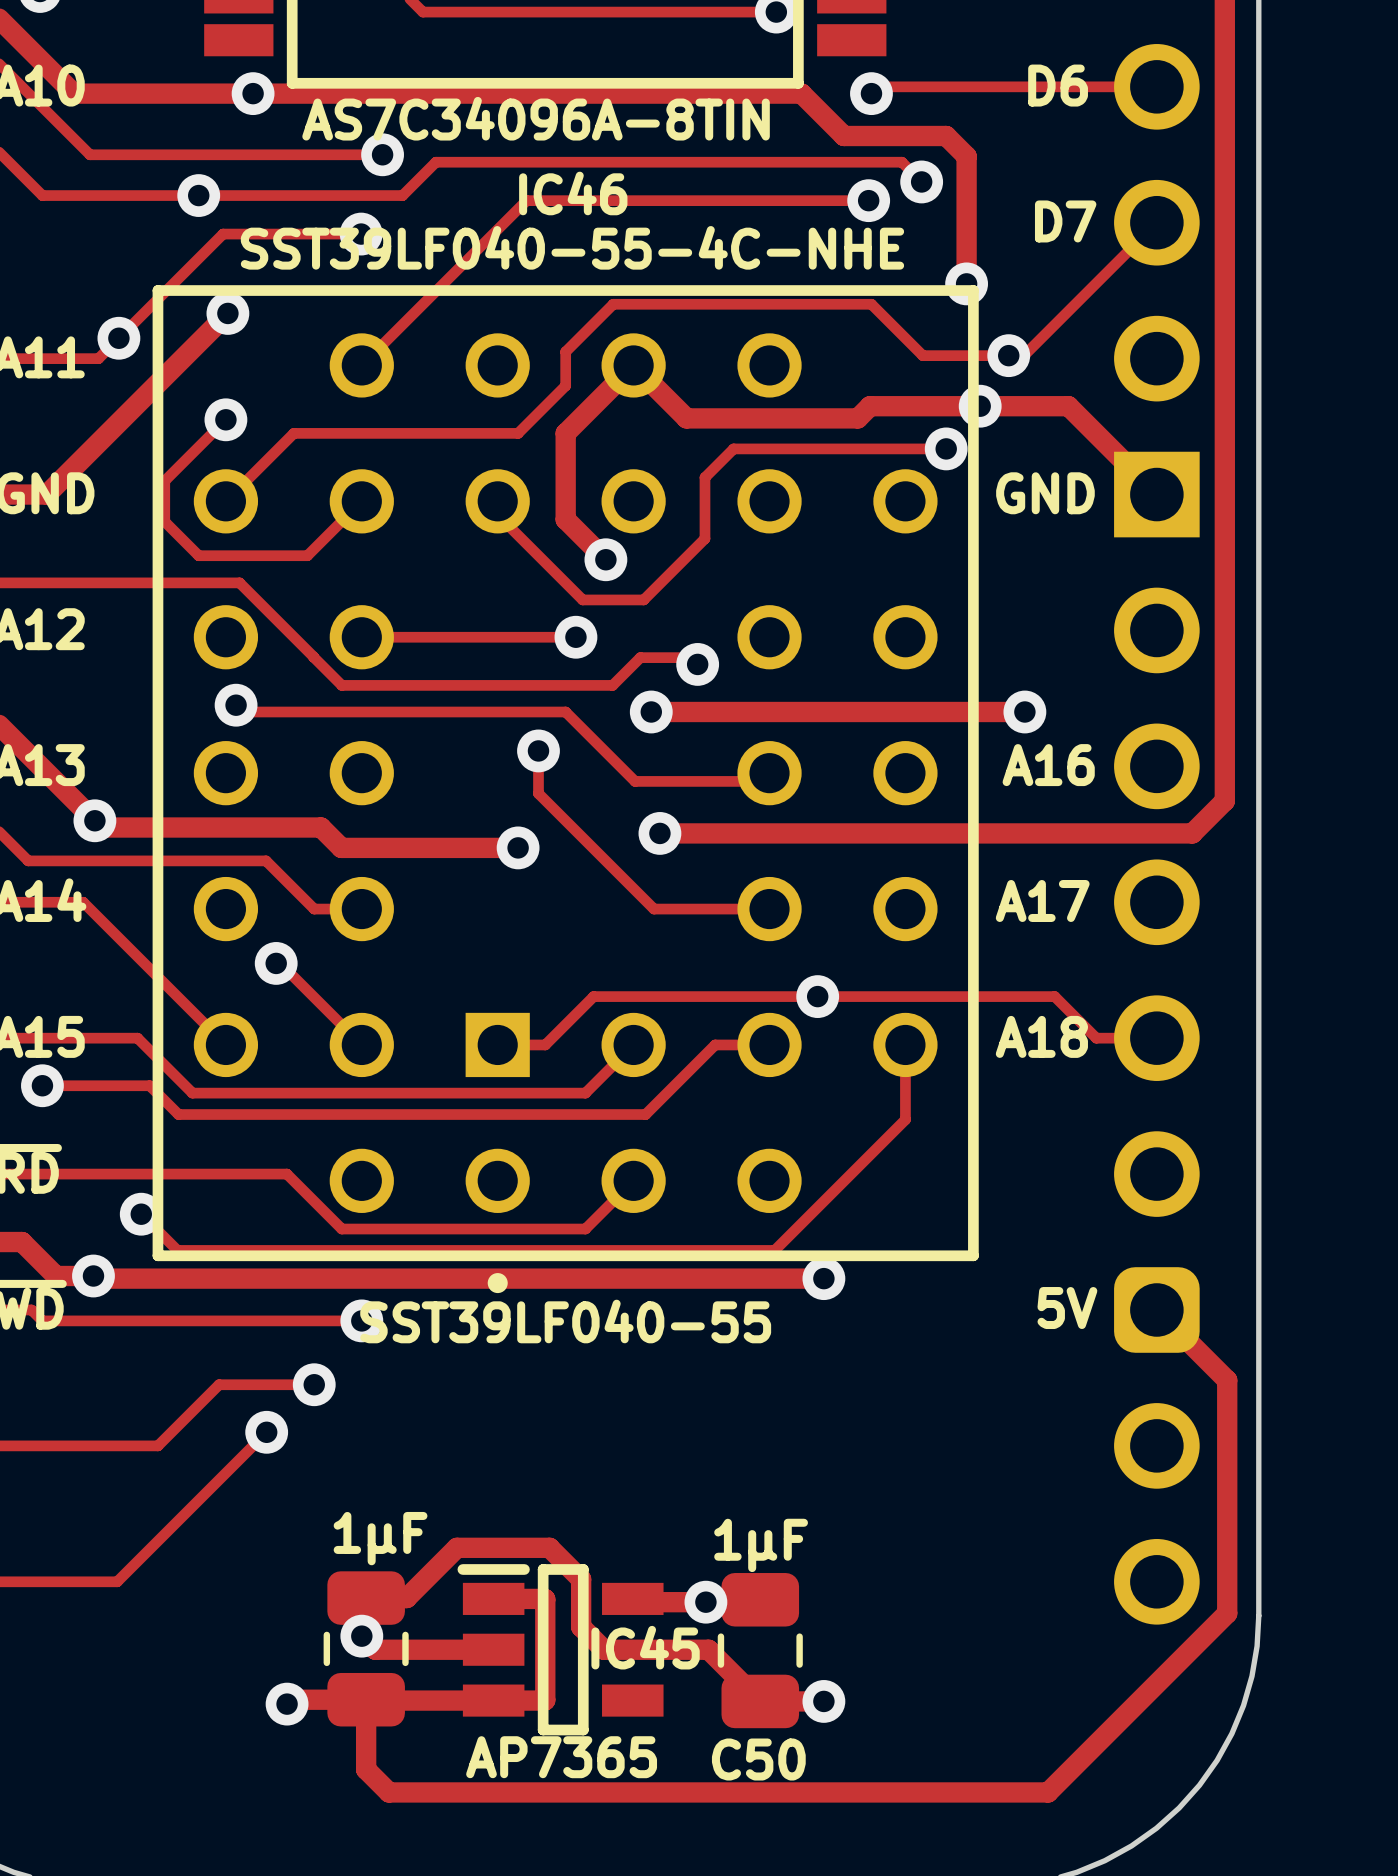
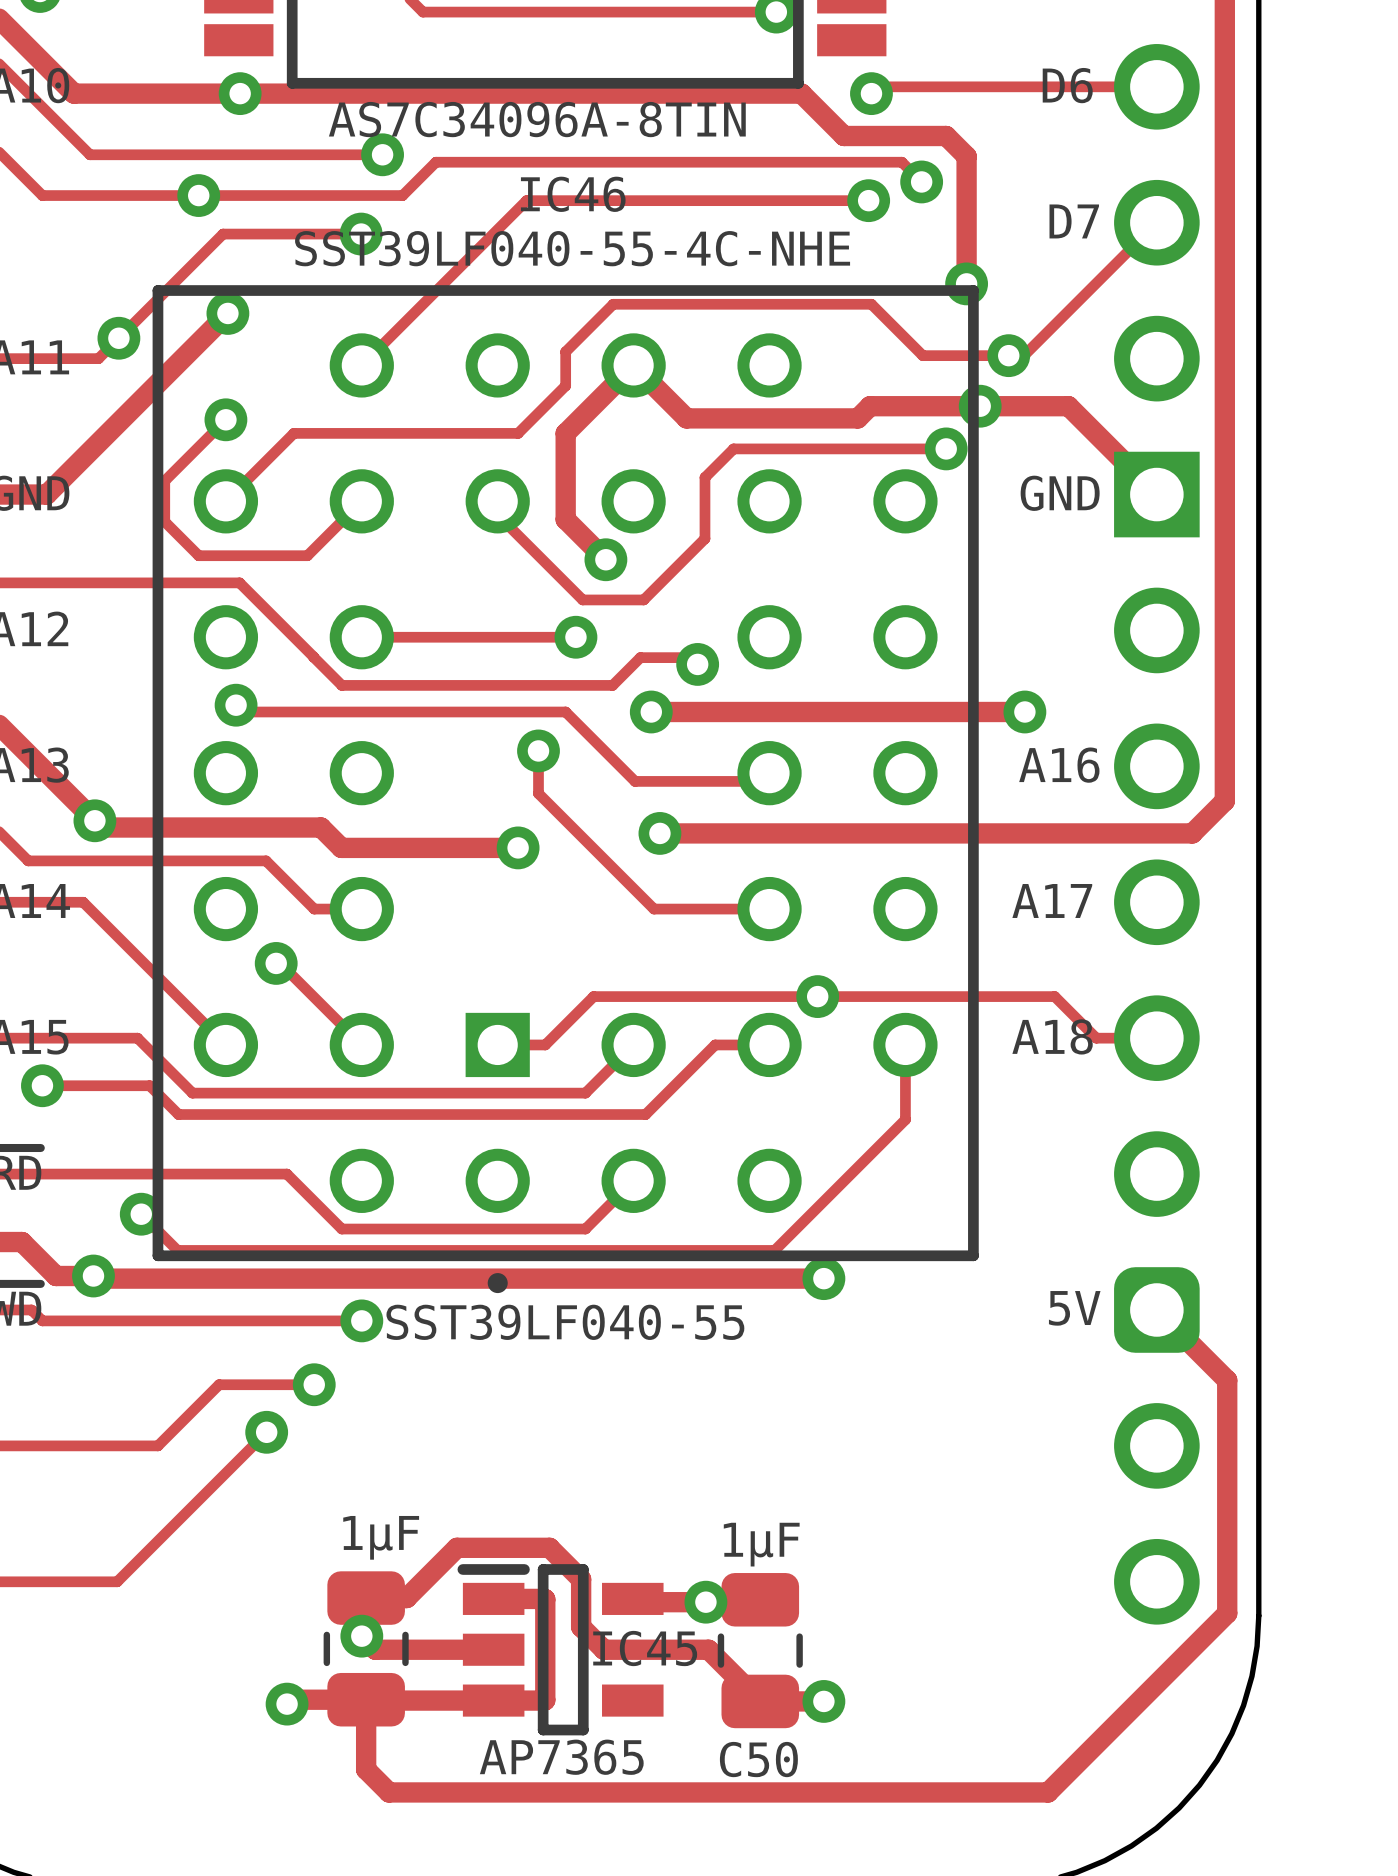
via position: (253, 93) -> (240, 93)

